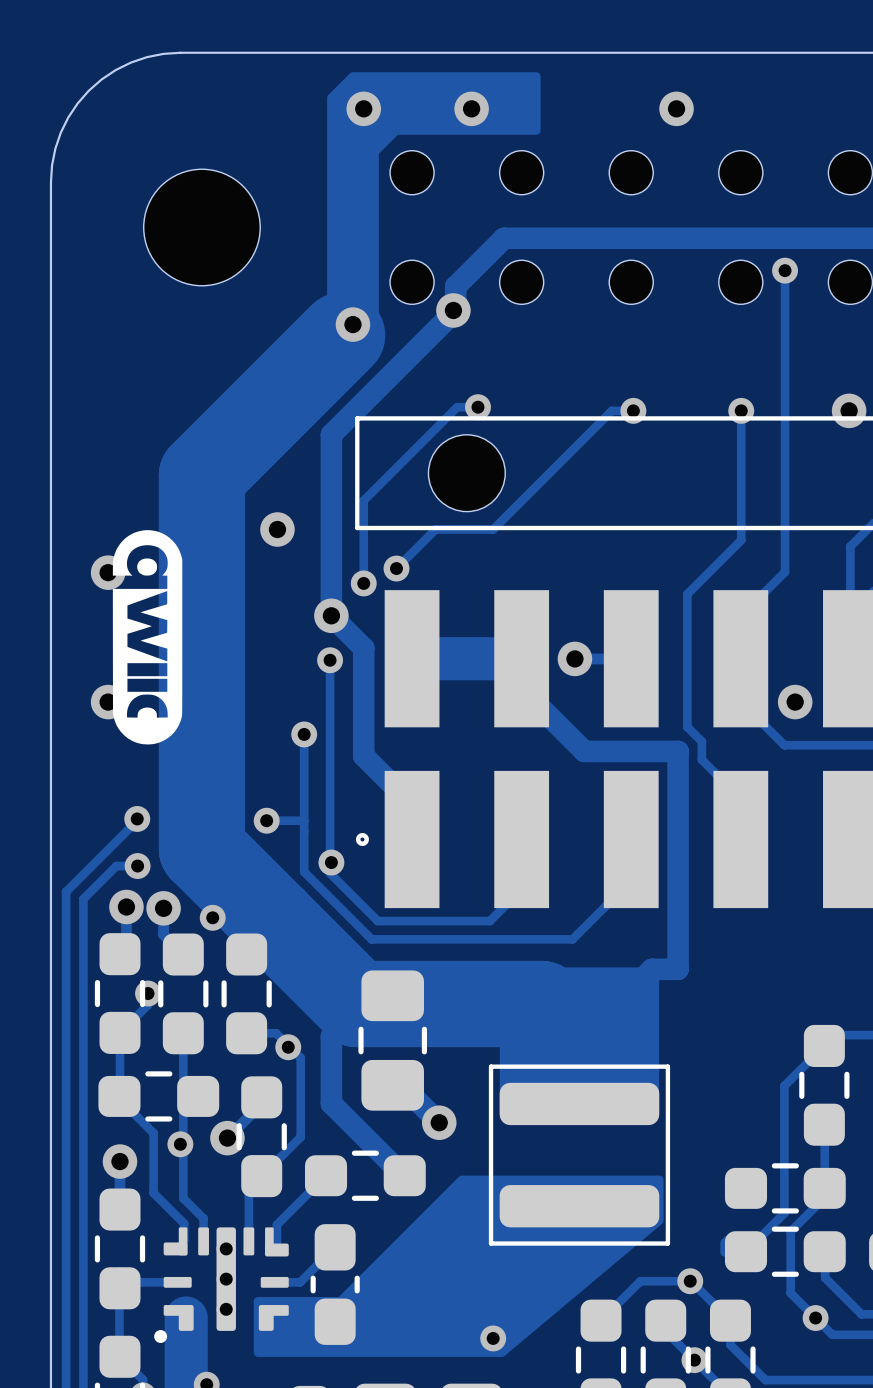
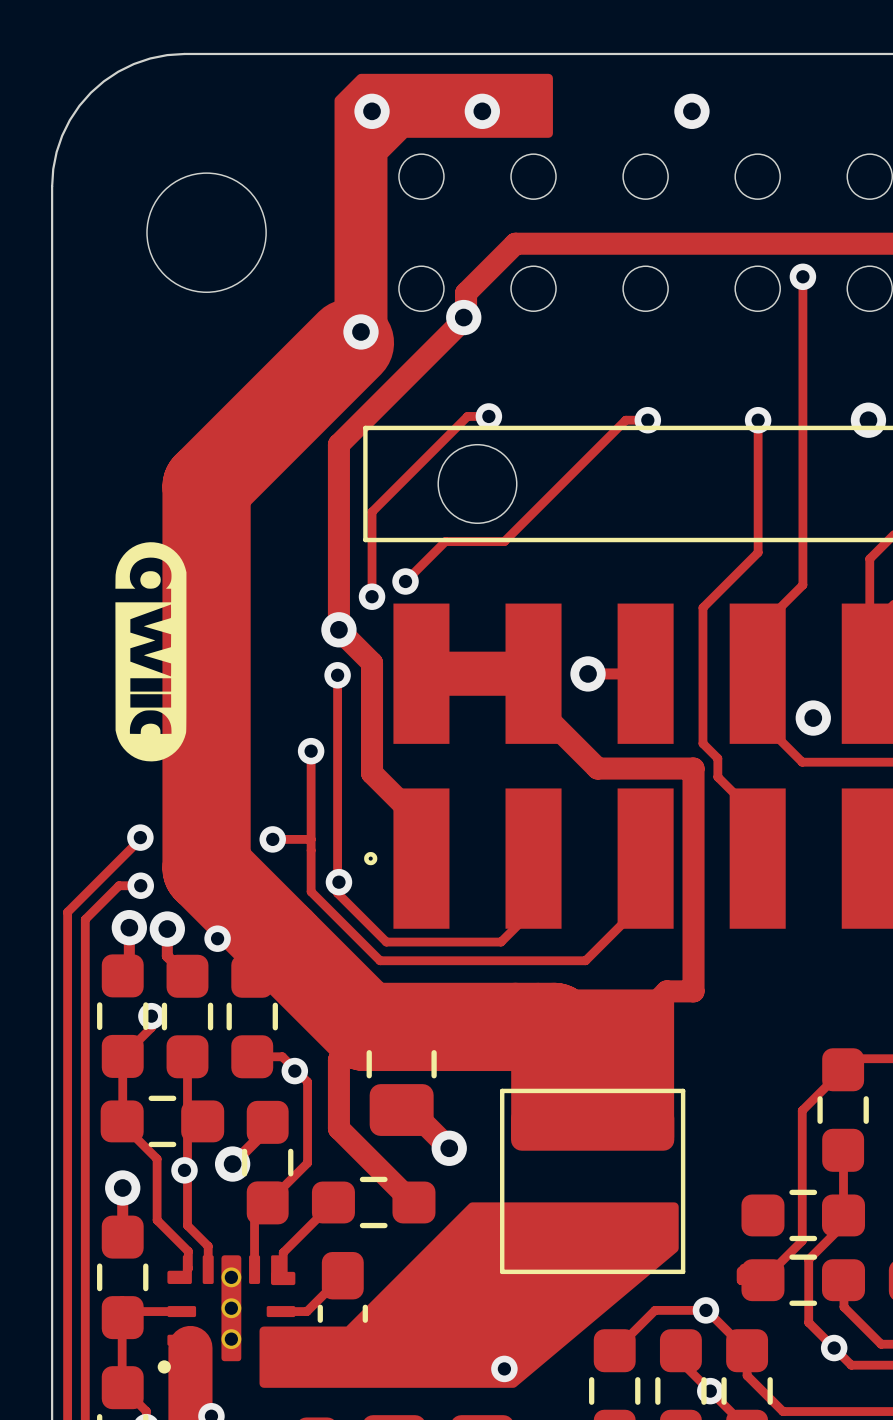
via: (277, 529) -> none
via: (108, 572) -> none
via: (108, 702) -> none

